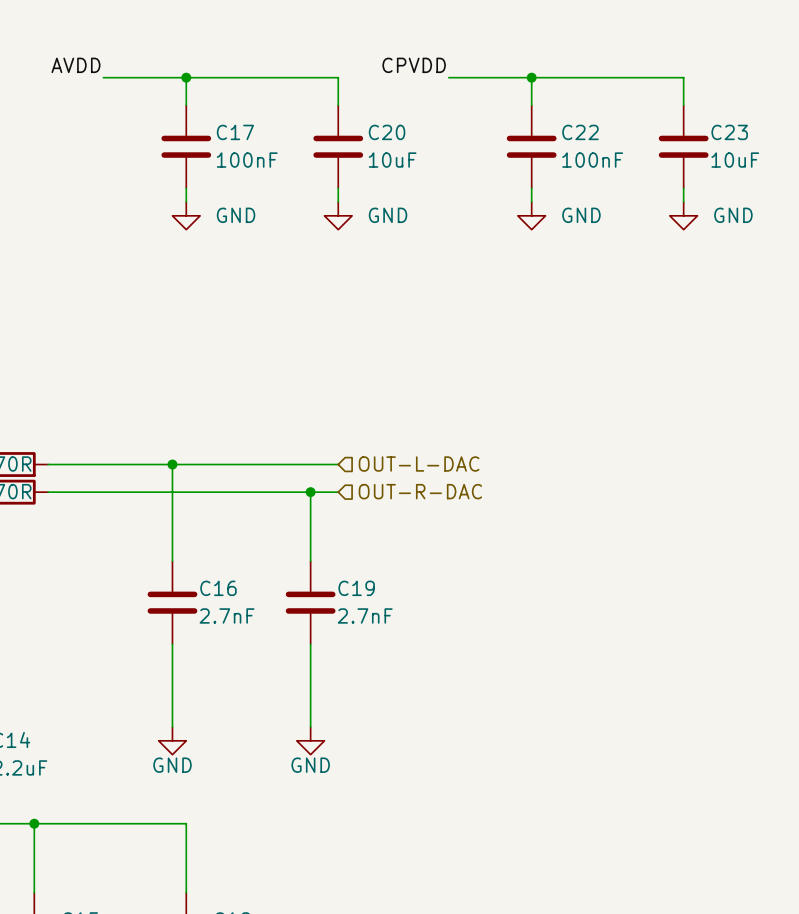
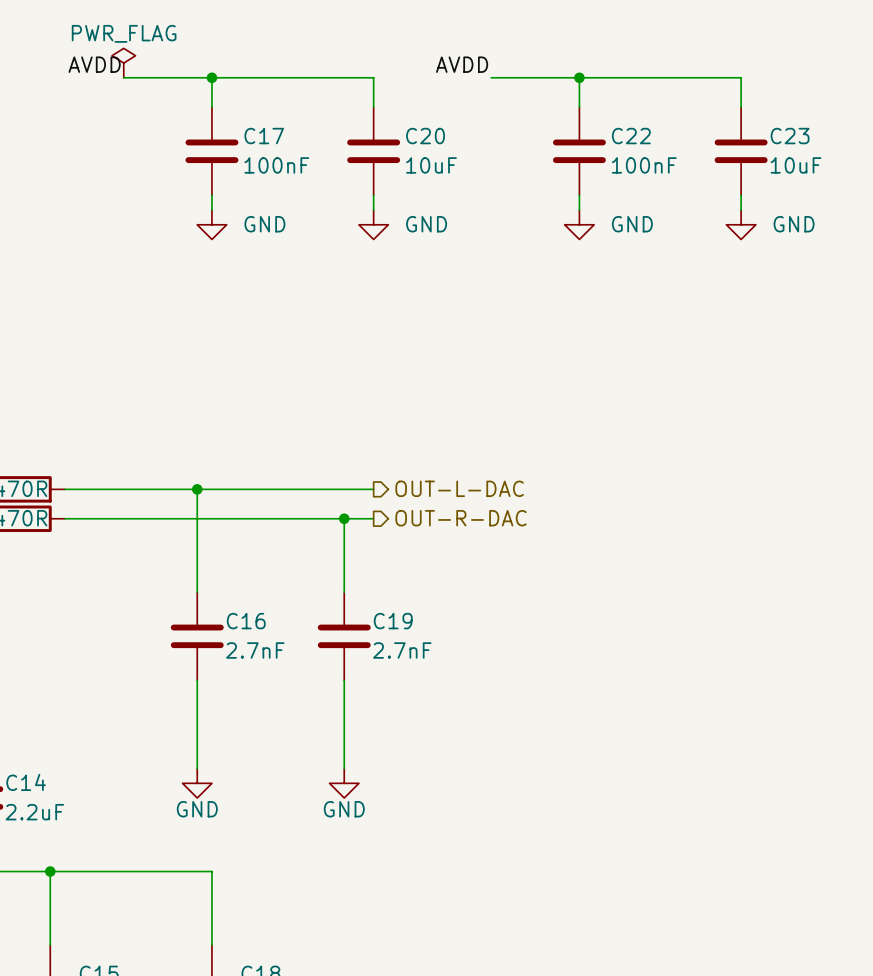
power symbol: none -> PWR_FLAG (123, 63)
label: CPVDD (414, 65) -> AVDD (462, 64)
hierarchical label shape: input (419, 464) -> output (459, 488)
hierarchical label shape: input (420, 491) -> output (461, 518)

